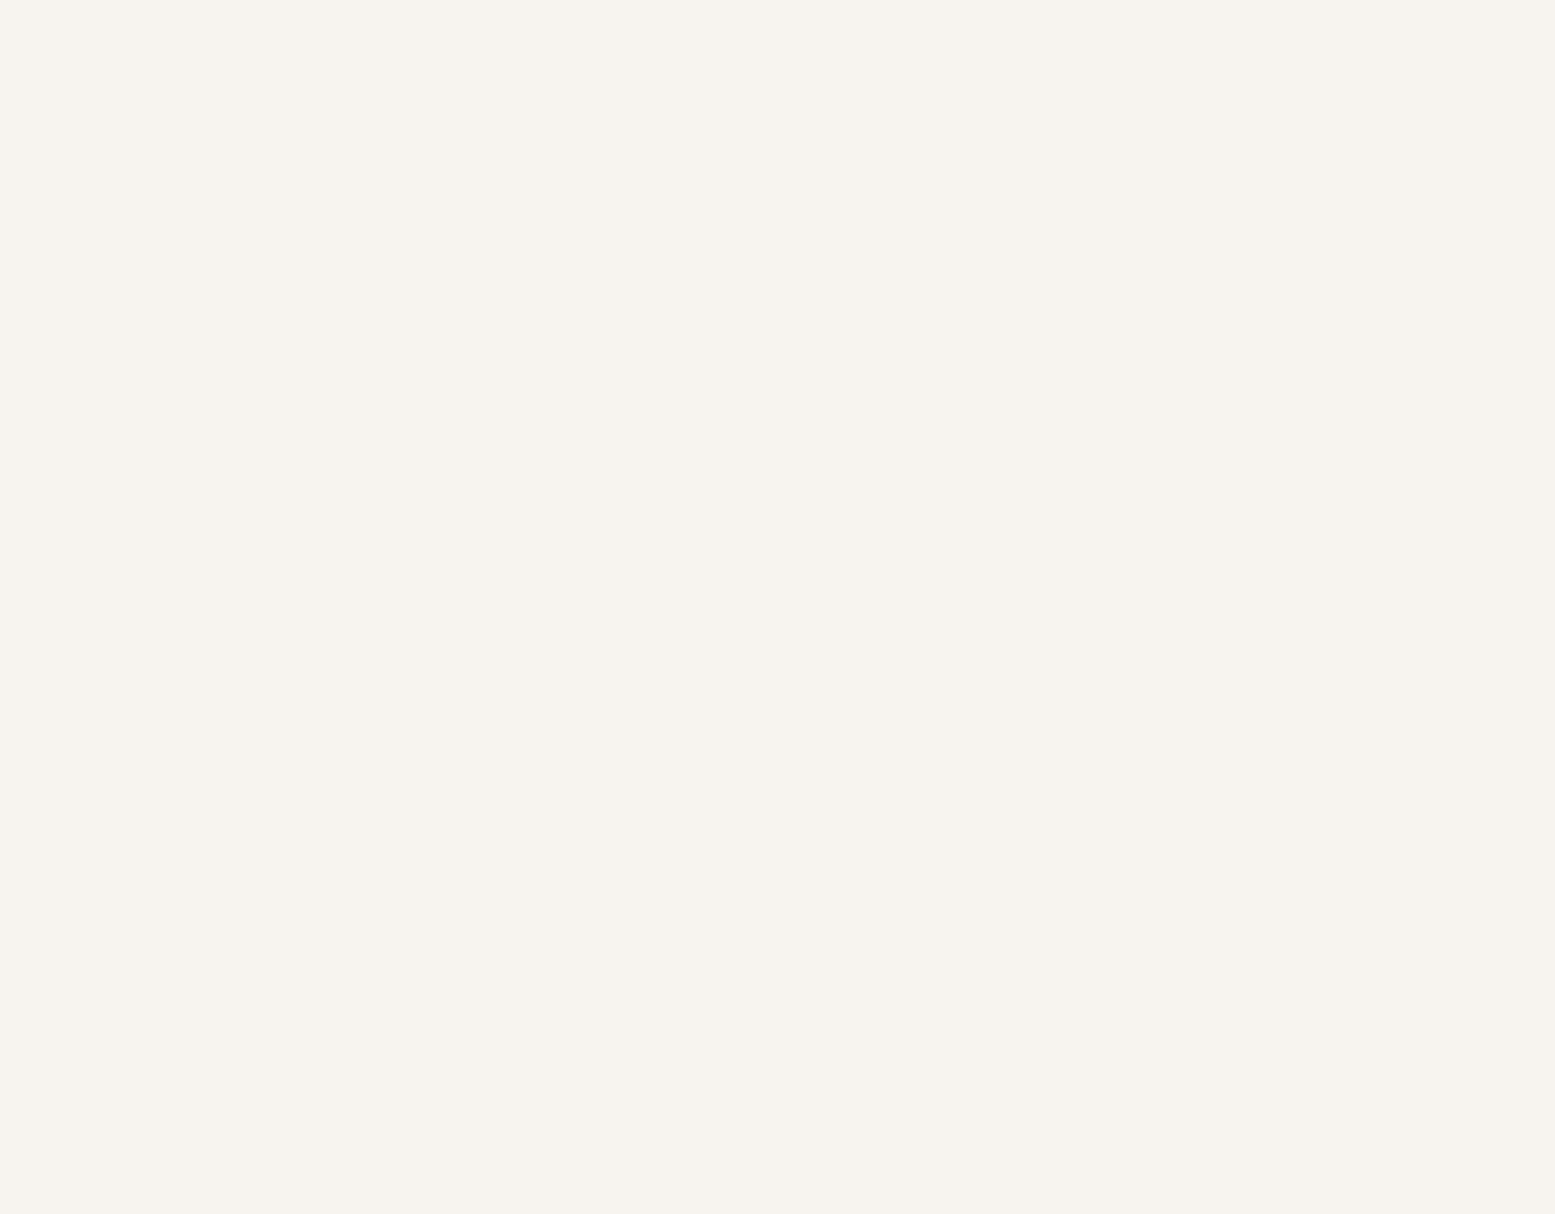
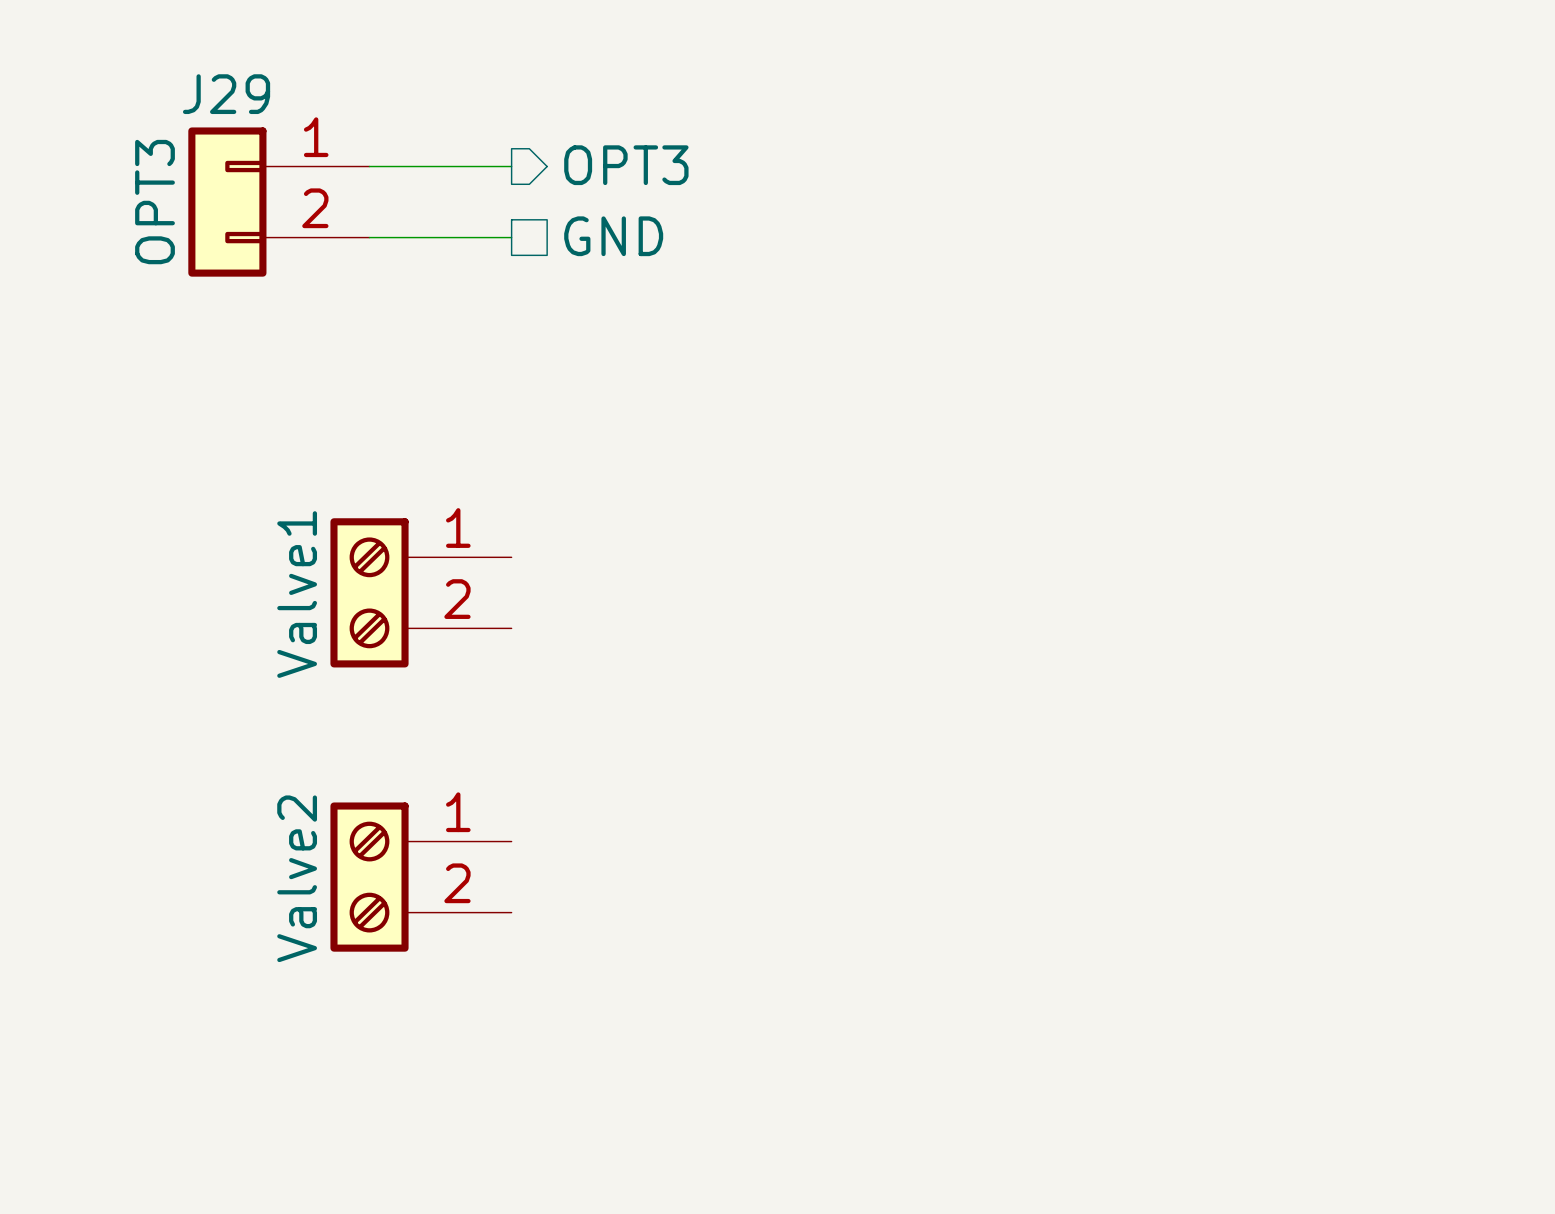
sheet pin: none -> OPT3 (626, 165)
wire: none -> (369, 166) (511, 166)
part: none -> OPT3 (278, 202)
sheet pin: none -> GND (613, 236)
wire: none -> (369, 237) (511, 237)
part: none -> Valve1 (421, 592)
part: none -> Valve2 (421, 877)

